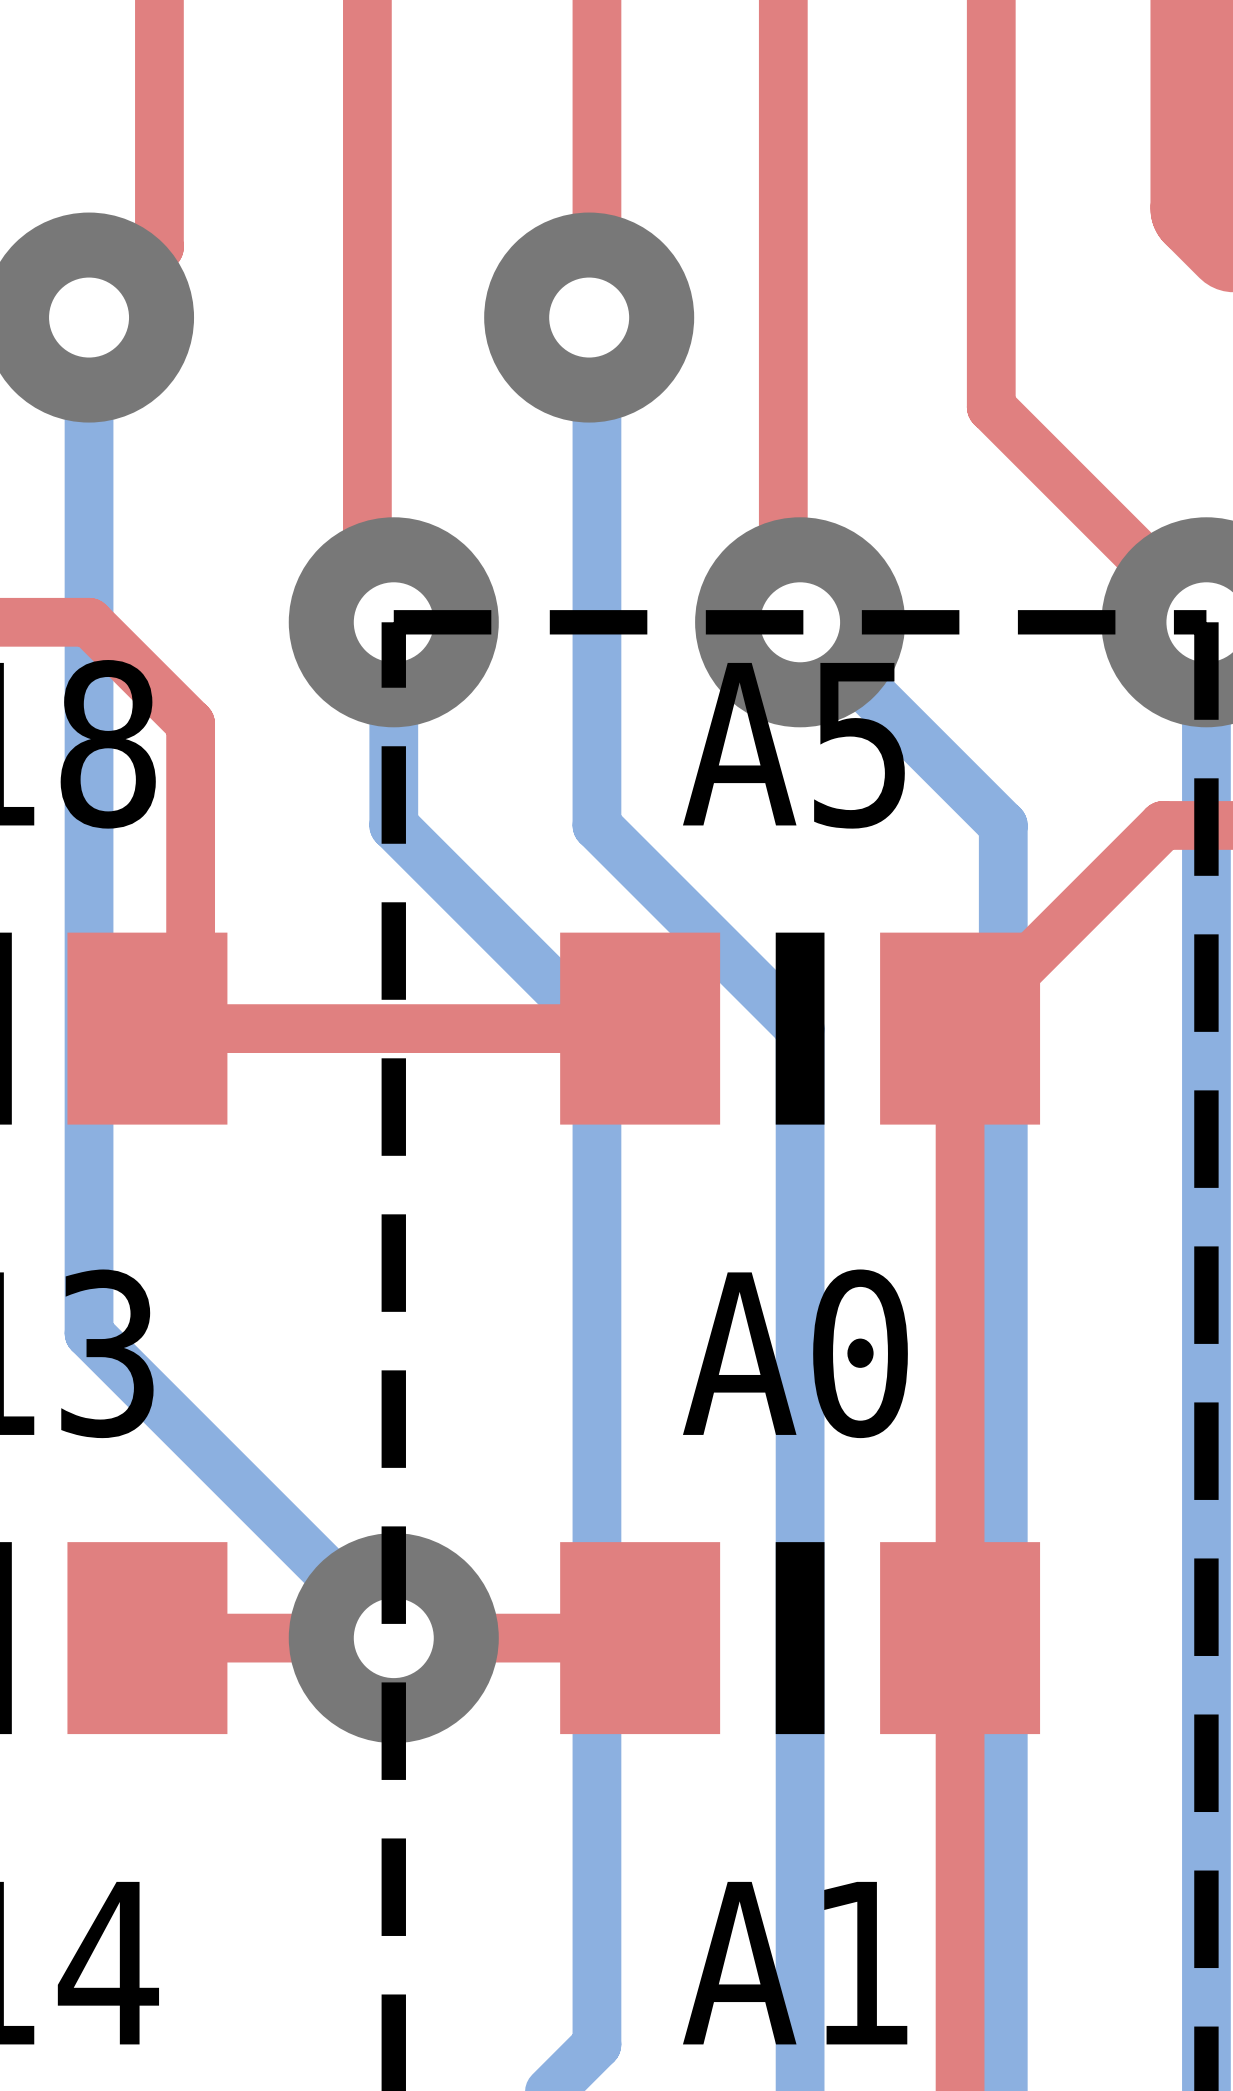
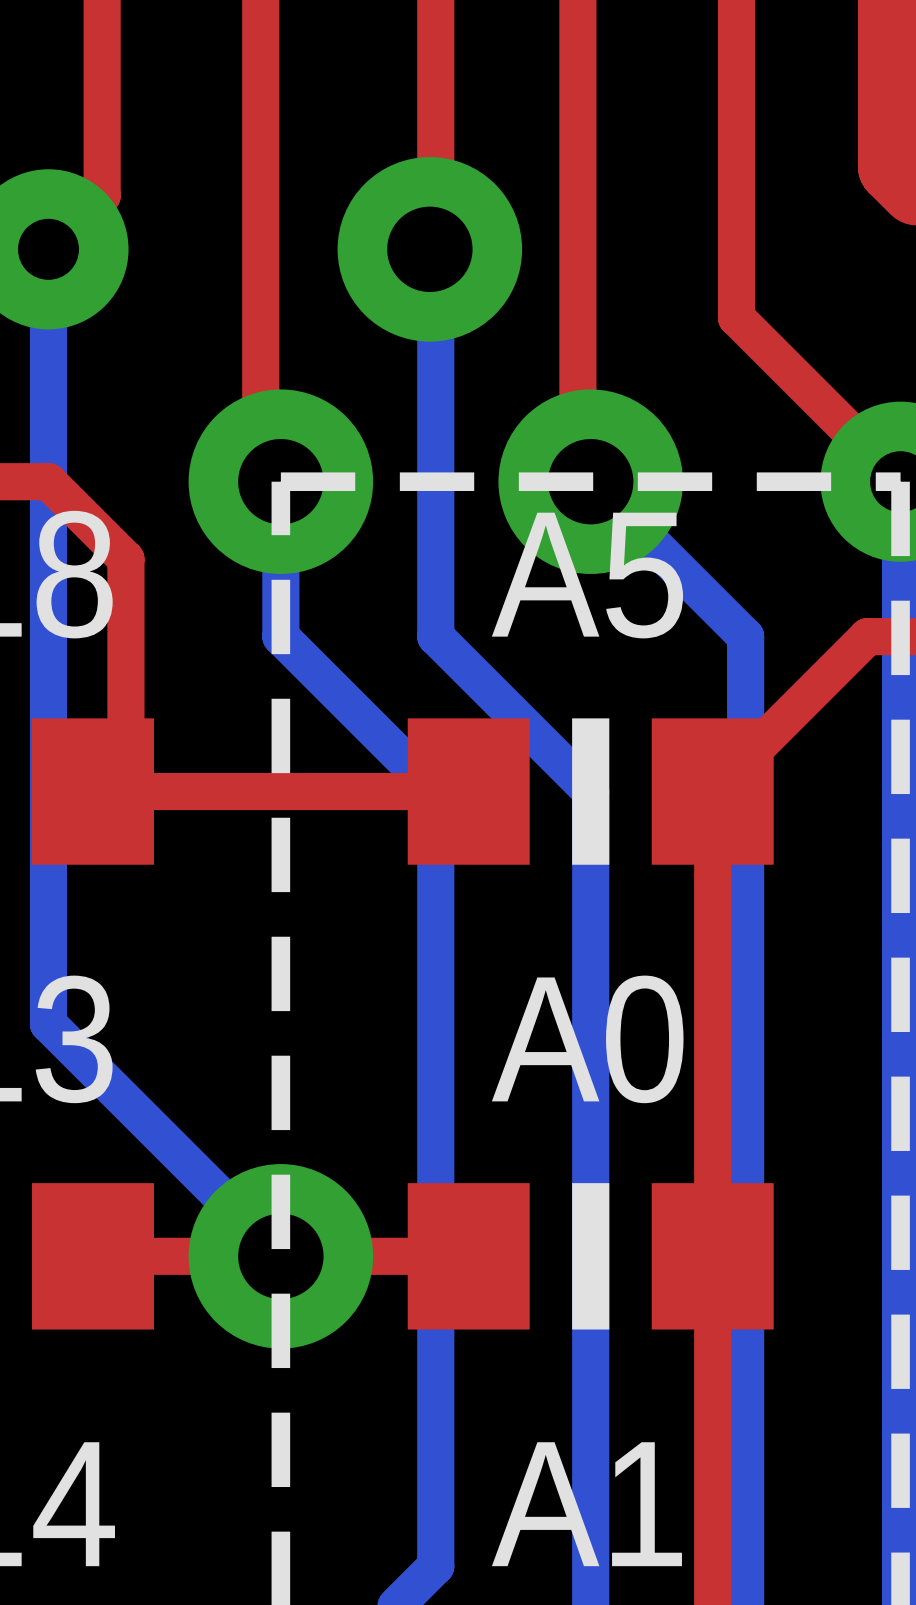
via size: [484, 212, 695, 423] -> [337, 157, 523, 342]
via size: [288, 517, 499, 728] -> [188, 389, 374, 574]
via size: [695, 517, 906, 728] -> [498, 389, 683, 574]
via size: [288, 1533, 499, 1744] -> [188, 1164, 374, 1349]

